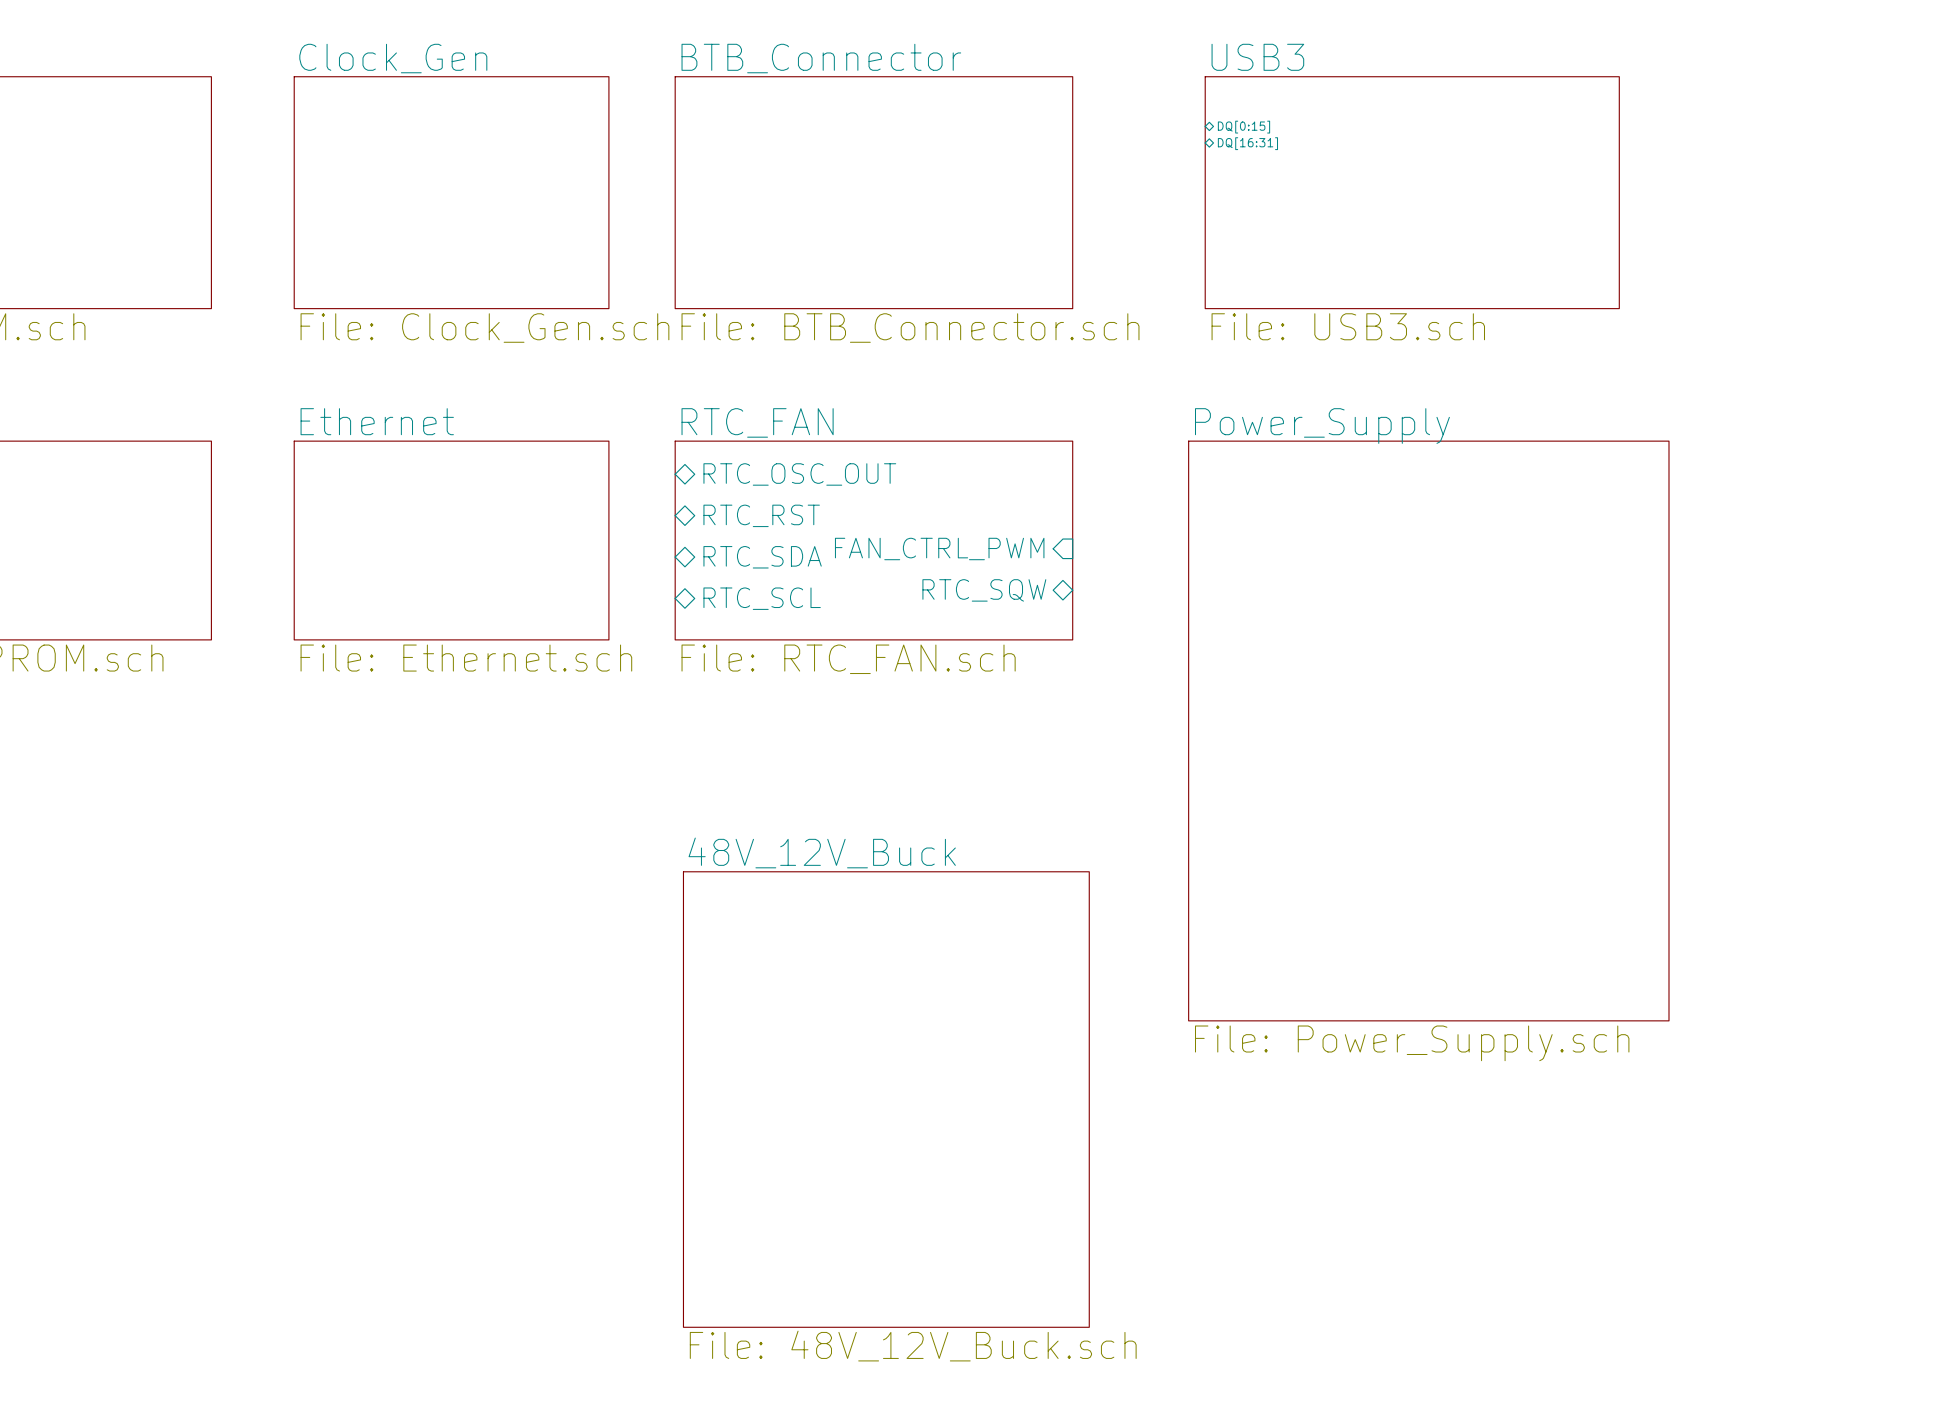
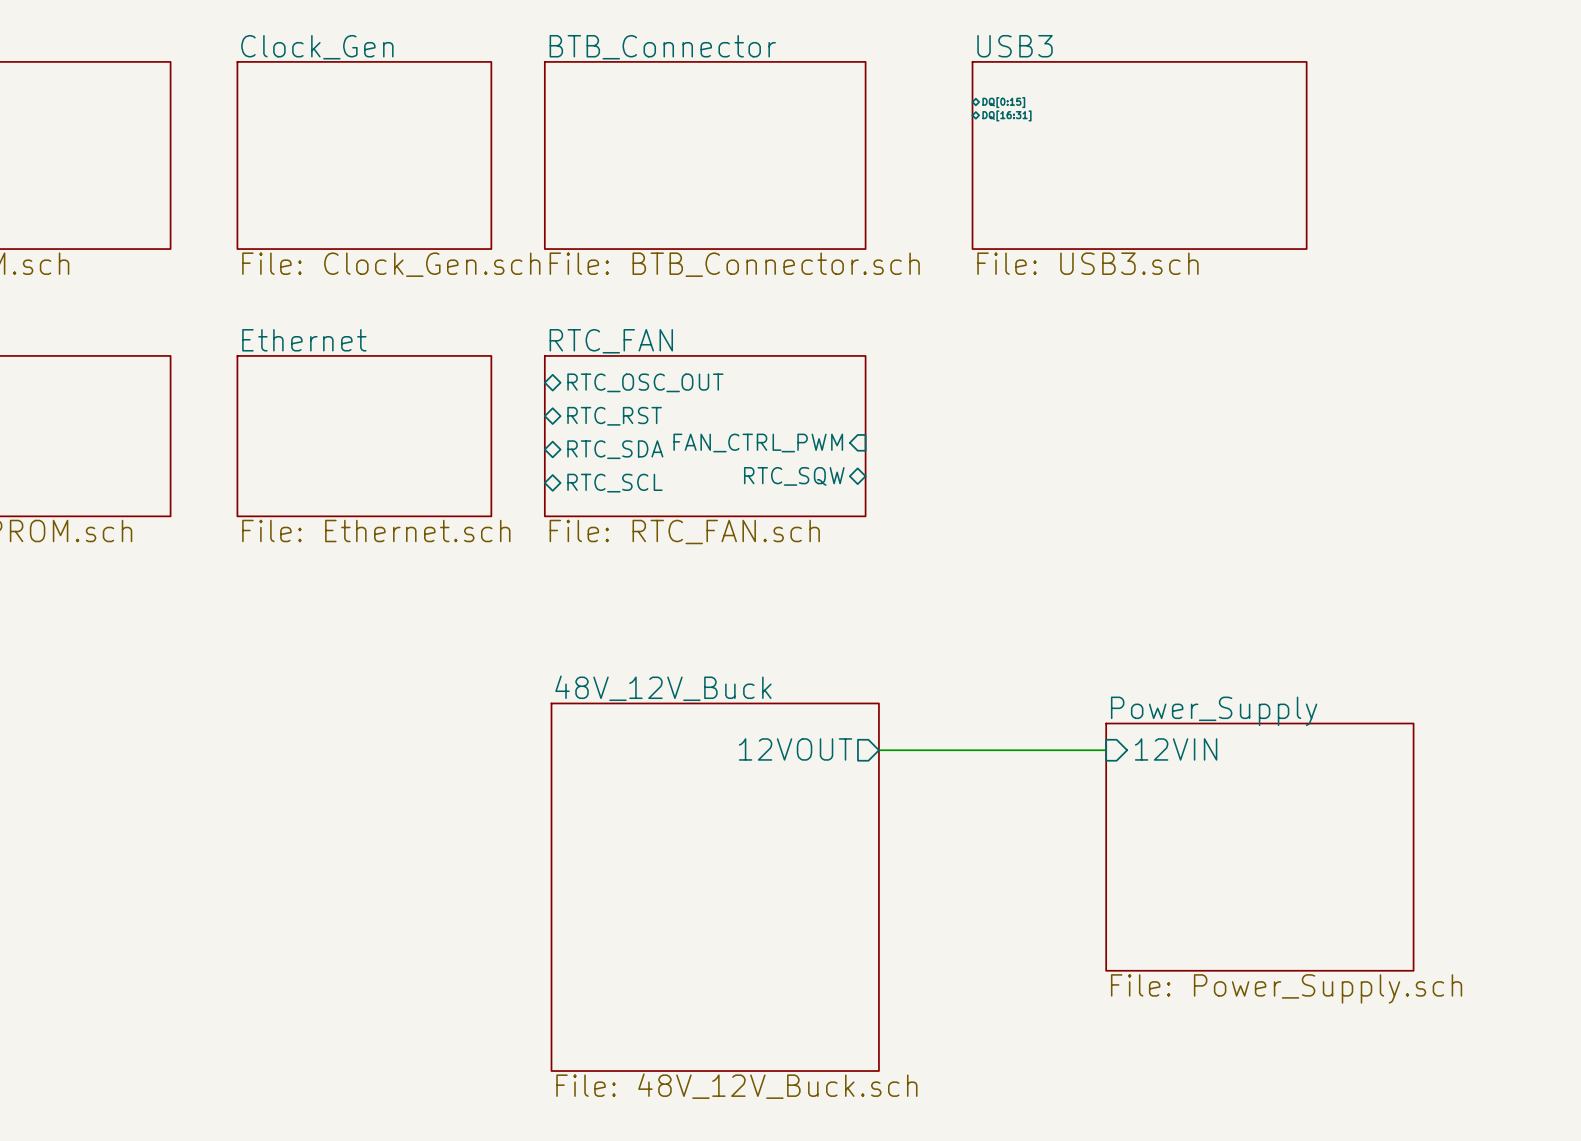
sheet Power_Supply: File: Power_Supply.sch (1428, 730) -> none
sheet pin: none -> 12VOUT (795, 749)
sheet pin: none -> 12VIN (1176, 749)
wire: none -> (878, 750) (1106, 750)
sheet Power_Supply: none -> File: Power_Supply.sch (1259, 847)

